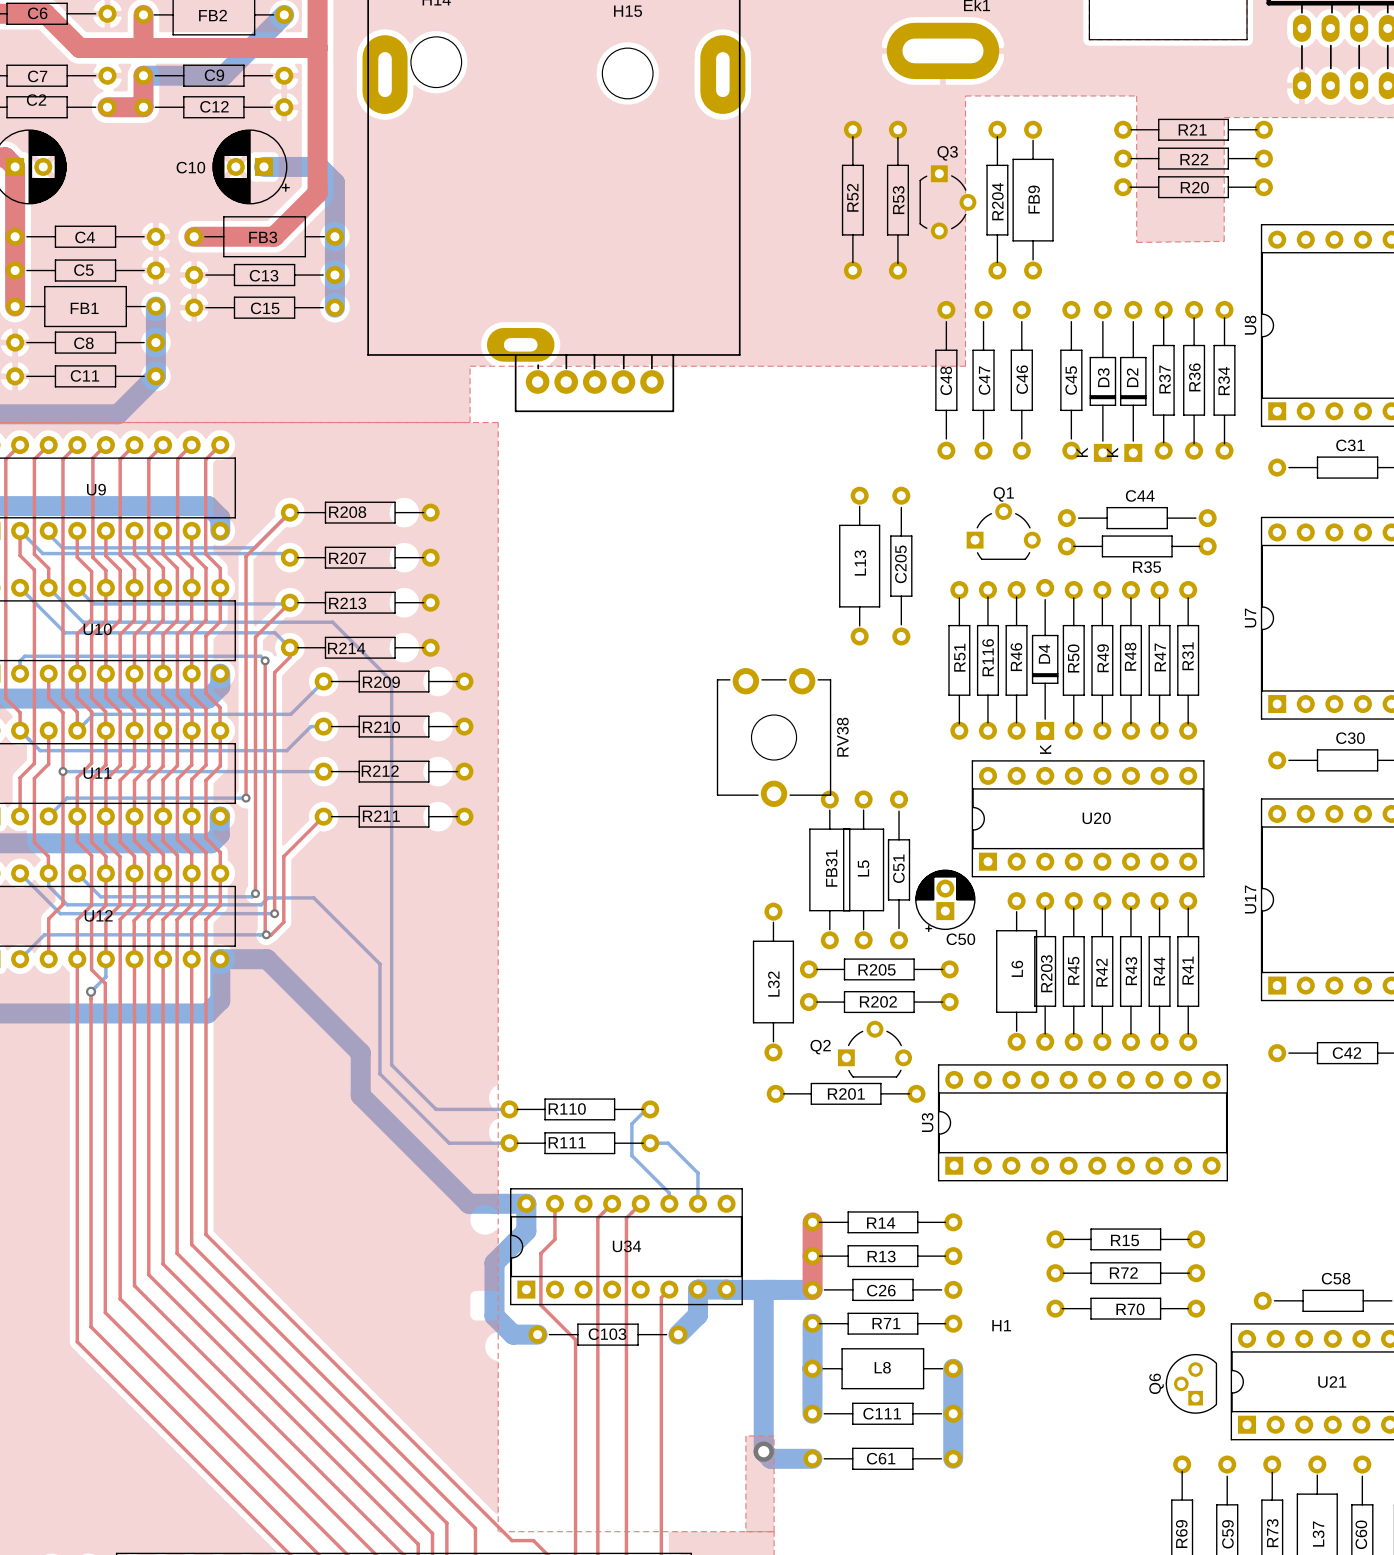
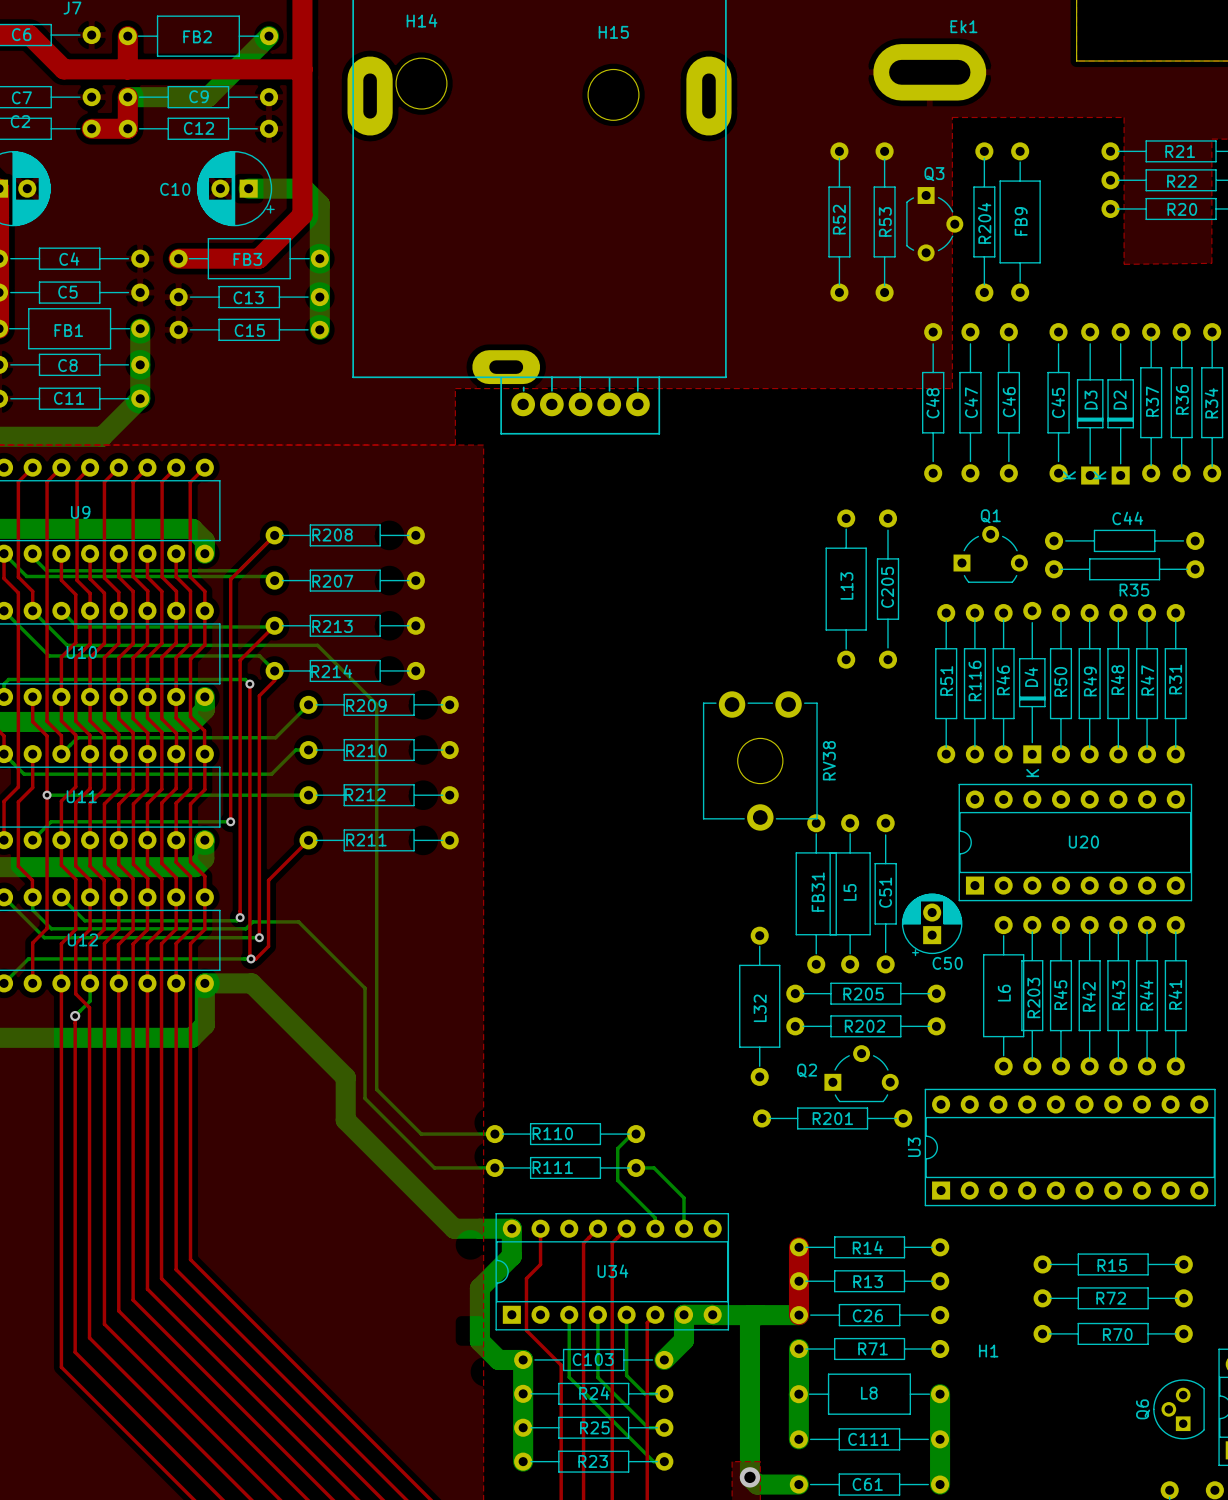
bottom track: none -> (569, 1314) (569, 1377) (653, 1461) (664, 1461)
bottom track: none -> (597, 1314) (597, 1377) (648, 1427) (664, 1427)
bottom track: none -> (626, 1314) (626, 1375) (644, 1393) (664, 1393)
bottom track: none -> (523, 1359) (523, 1461)
R24: none -> (593, 1393)
R25: none -> (593, 1427)
R23: none -> (593, 1461)

